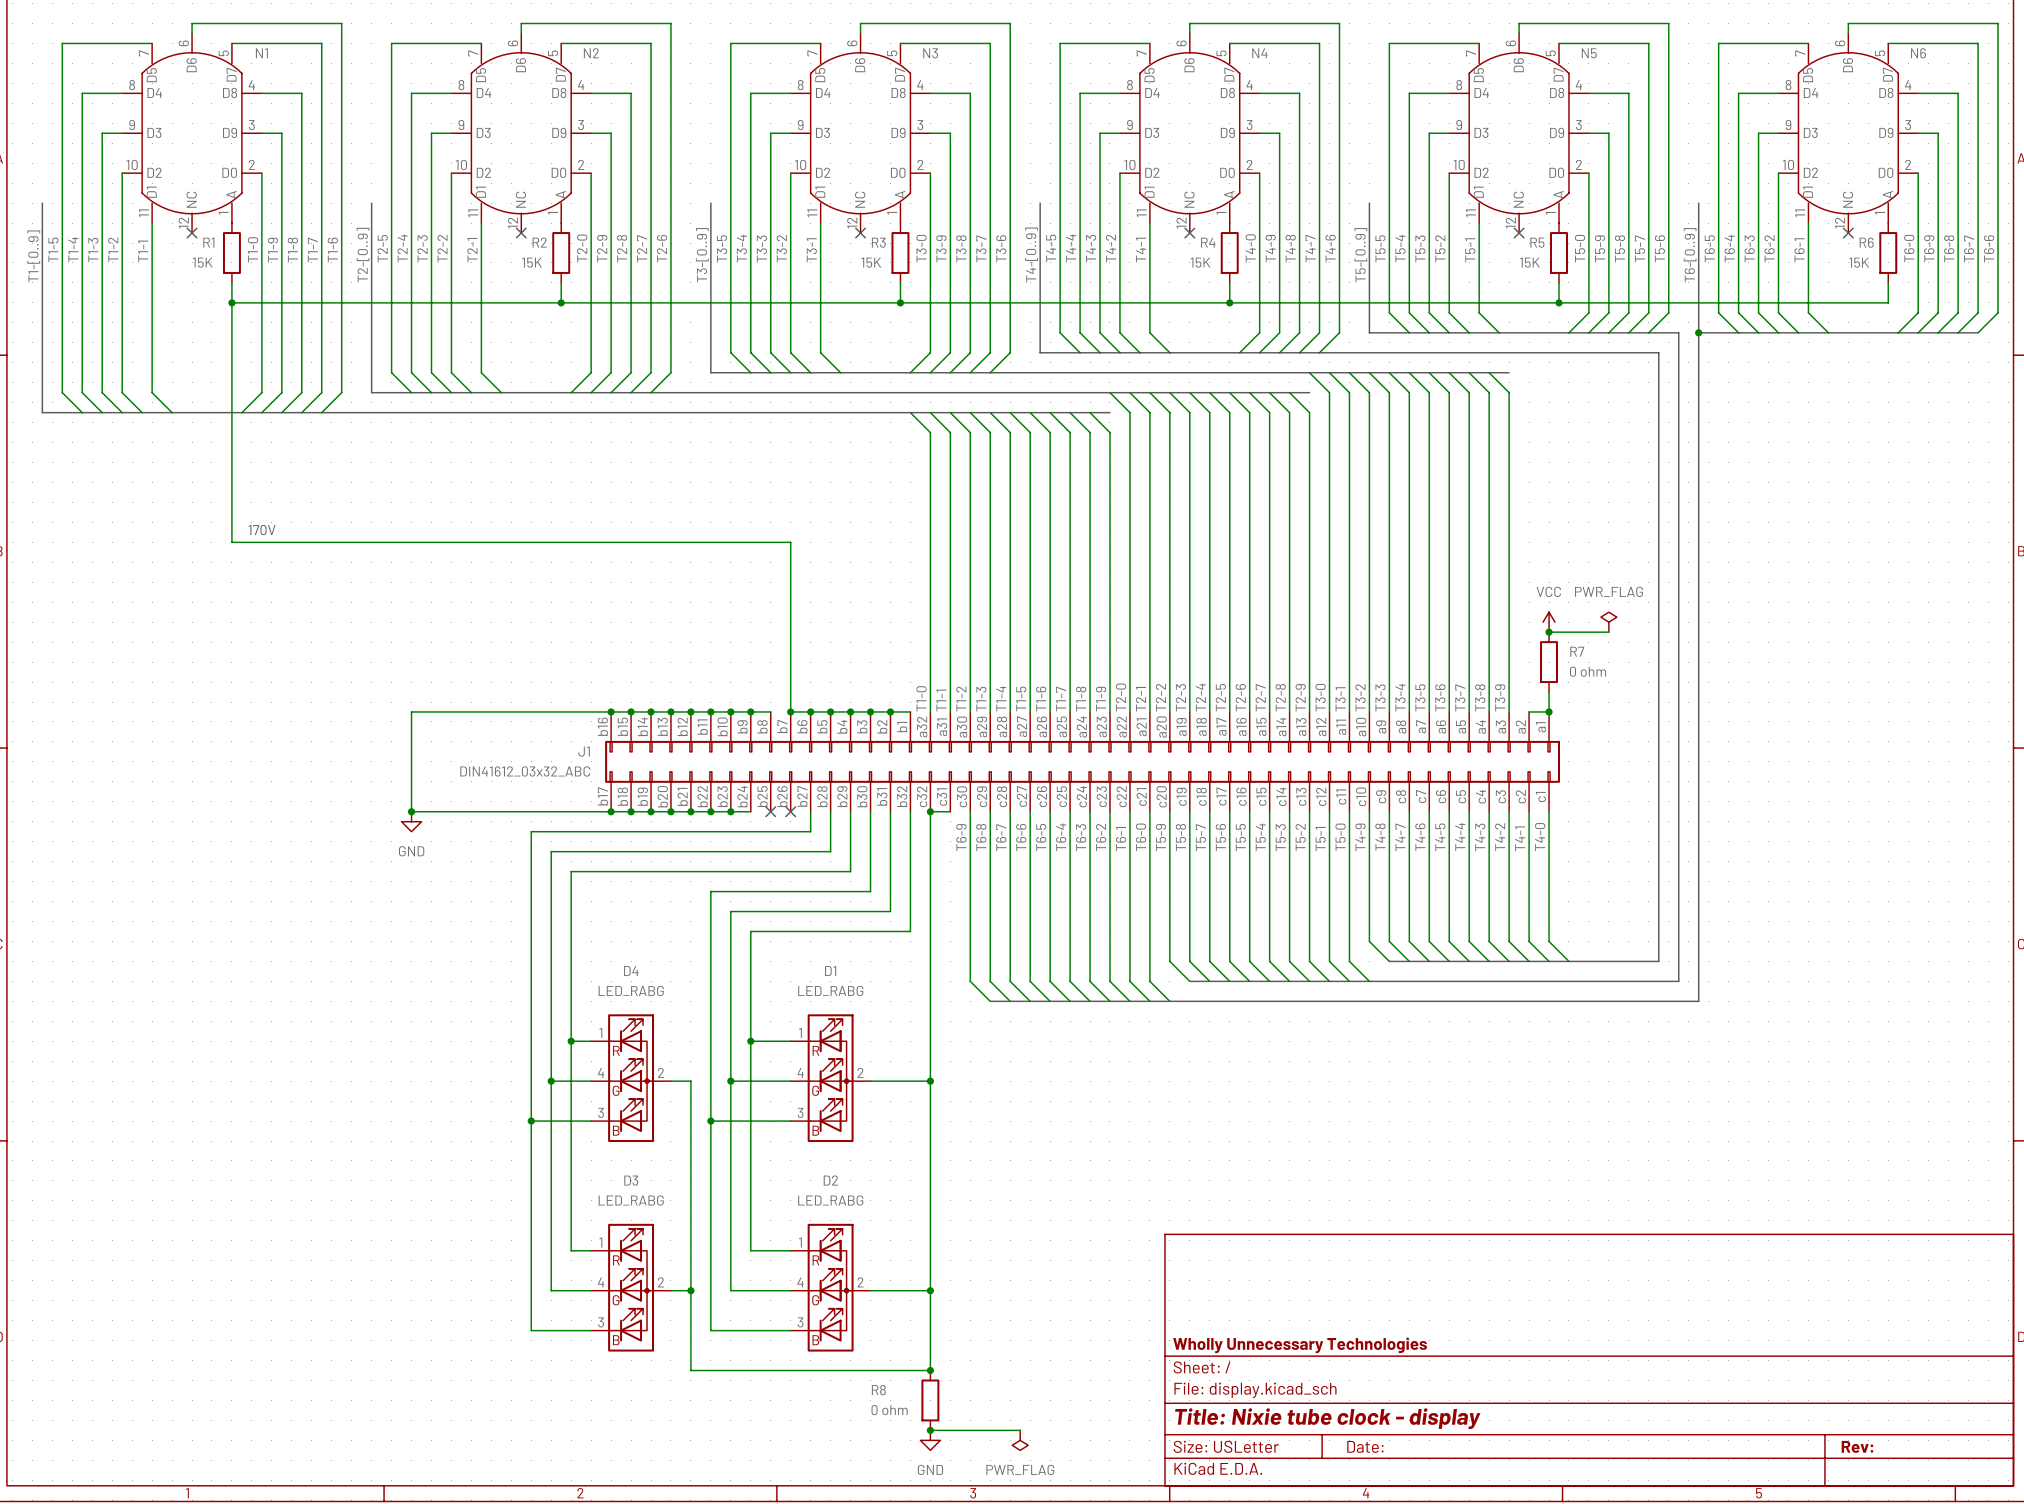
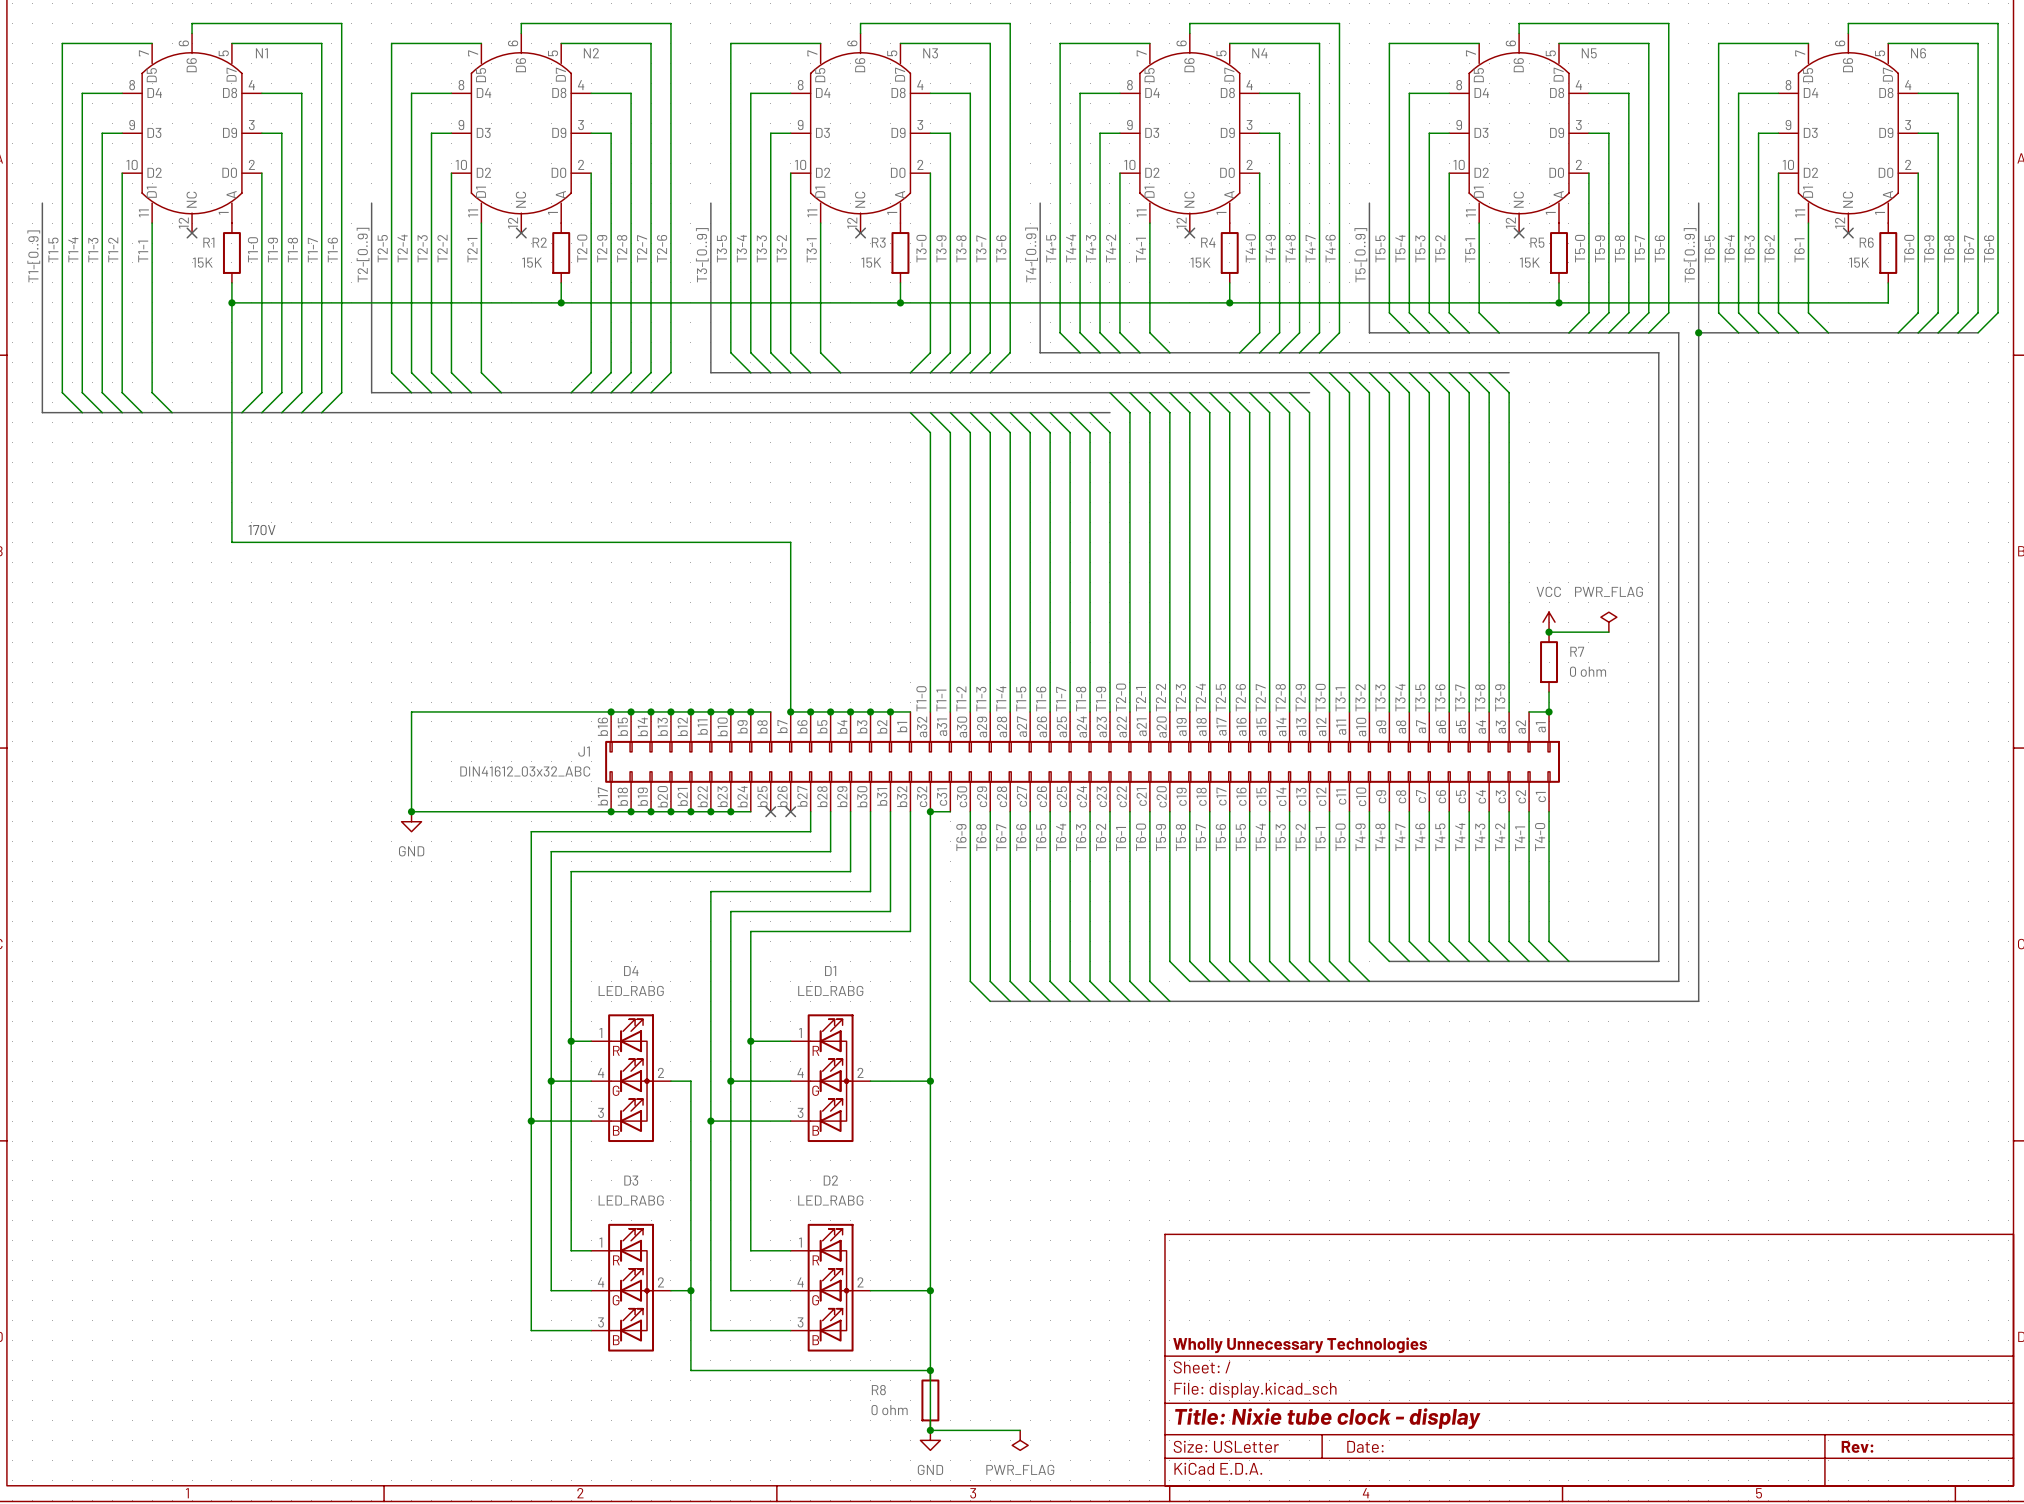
wire: none -> (930, 1370) (930, 1430)

